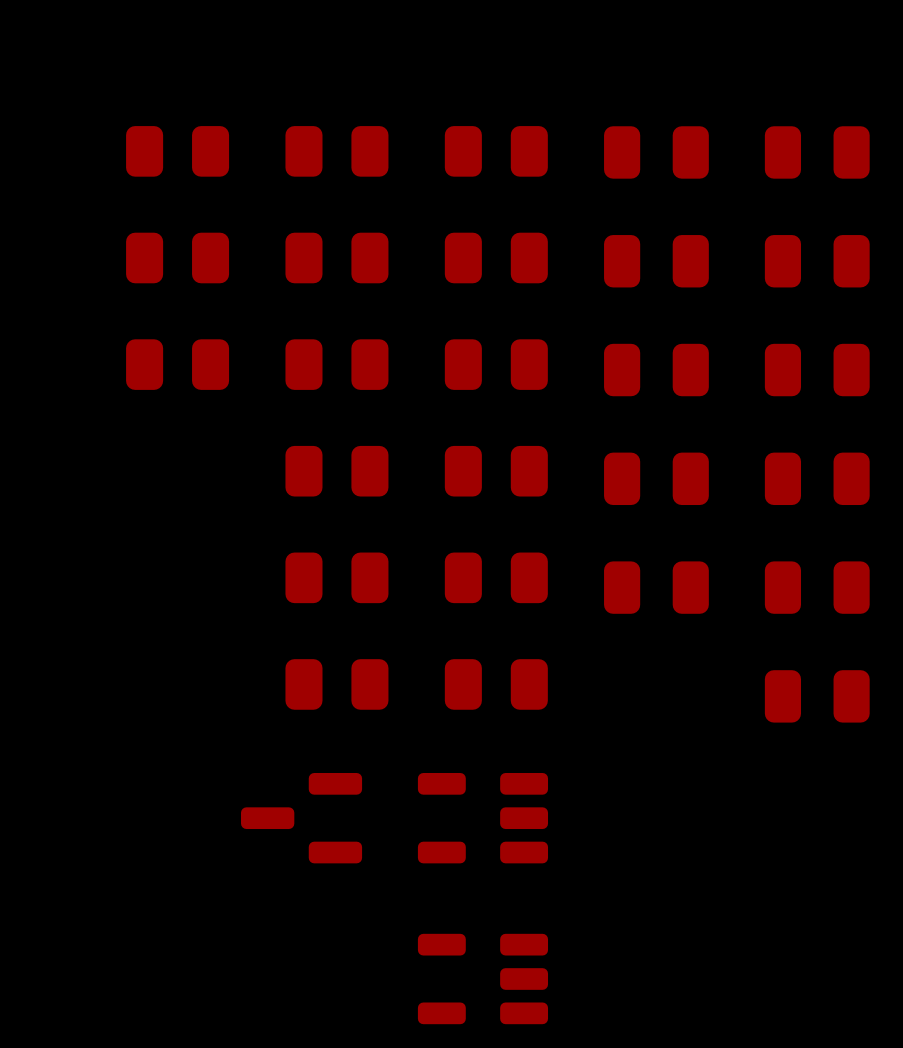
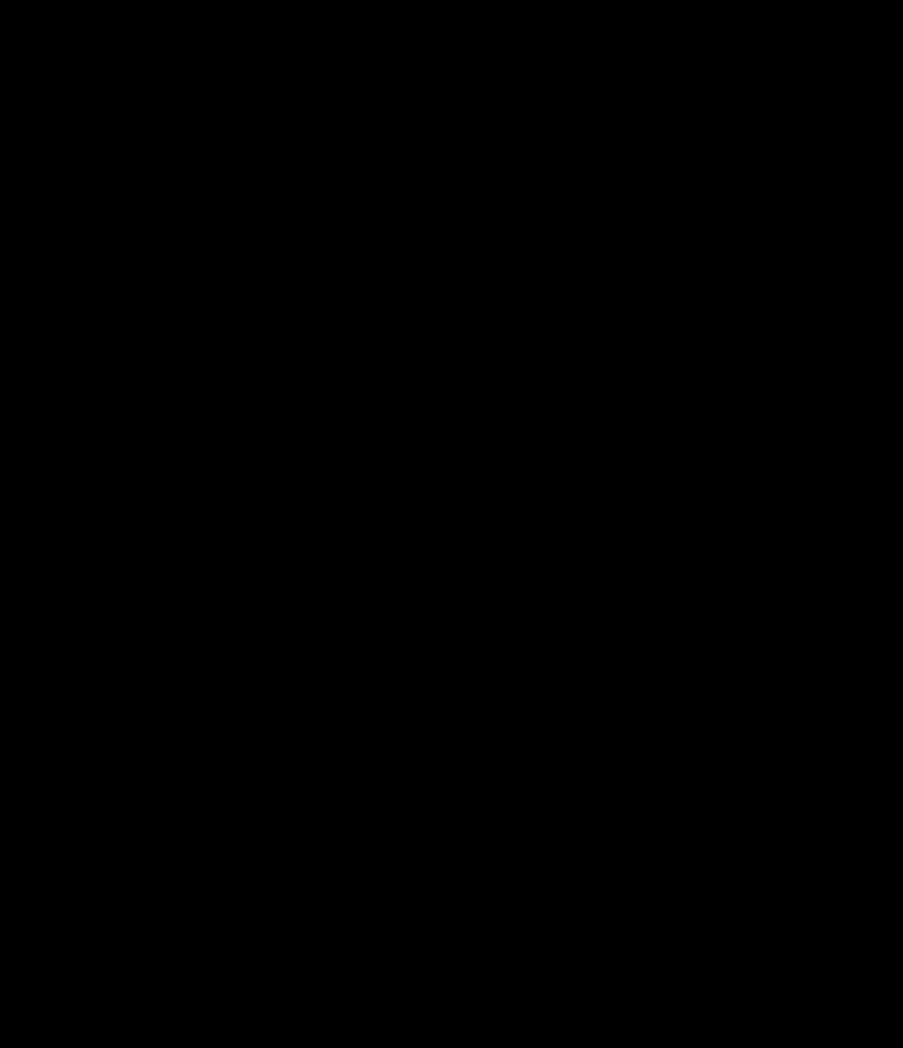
part: (177, 151) -> none
part: (336, 151) -> none
part: (496, 151) -> none
part: (656, 152) -> none
part: (817, 152) -> none
part: (177, 257) -> none
part: (336, 257) -> none
part: (496, 257) -> none
part: (656, 261) -> none
part: (817, 261) -> none
part: (177, 364) -> none
part: (336, 364) -> none
part: (496, 364) -> none
part: (656, 370) -> none
part: (817, 370) -> none
part: (336, 471) -> none
part: (496, 471) -> none
part: (656, 478) -> none
part: (817, 478) -> none
part: (336, 577) -> none
part: (496, 577) -> none
part: (656, 587) -> none
part: (817, 587) -> none
part: (336, 684) -> none
part: (496, 684) -> none
part: (817, 696) -> none
part: (301, 818) -> none
part: (482, 818) -> none
part: (482, 979) -> none

